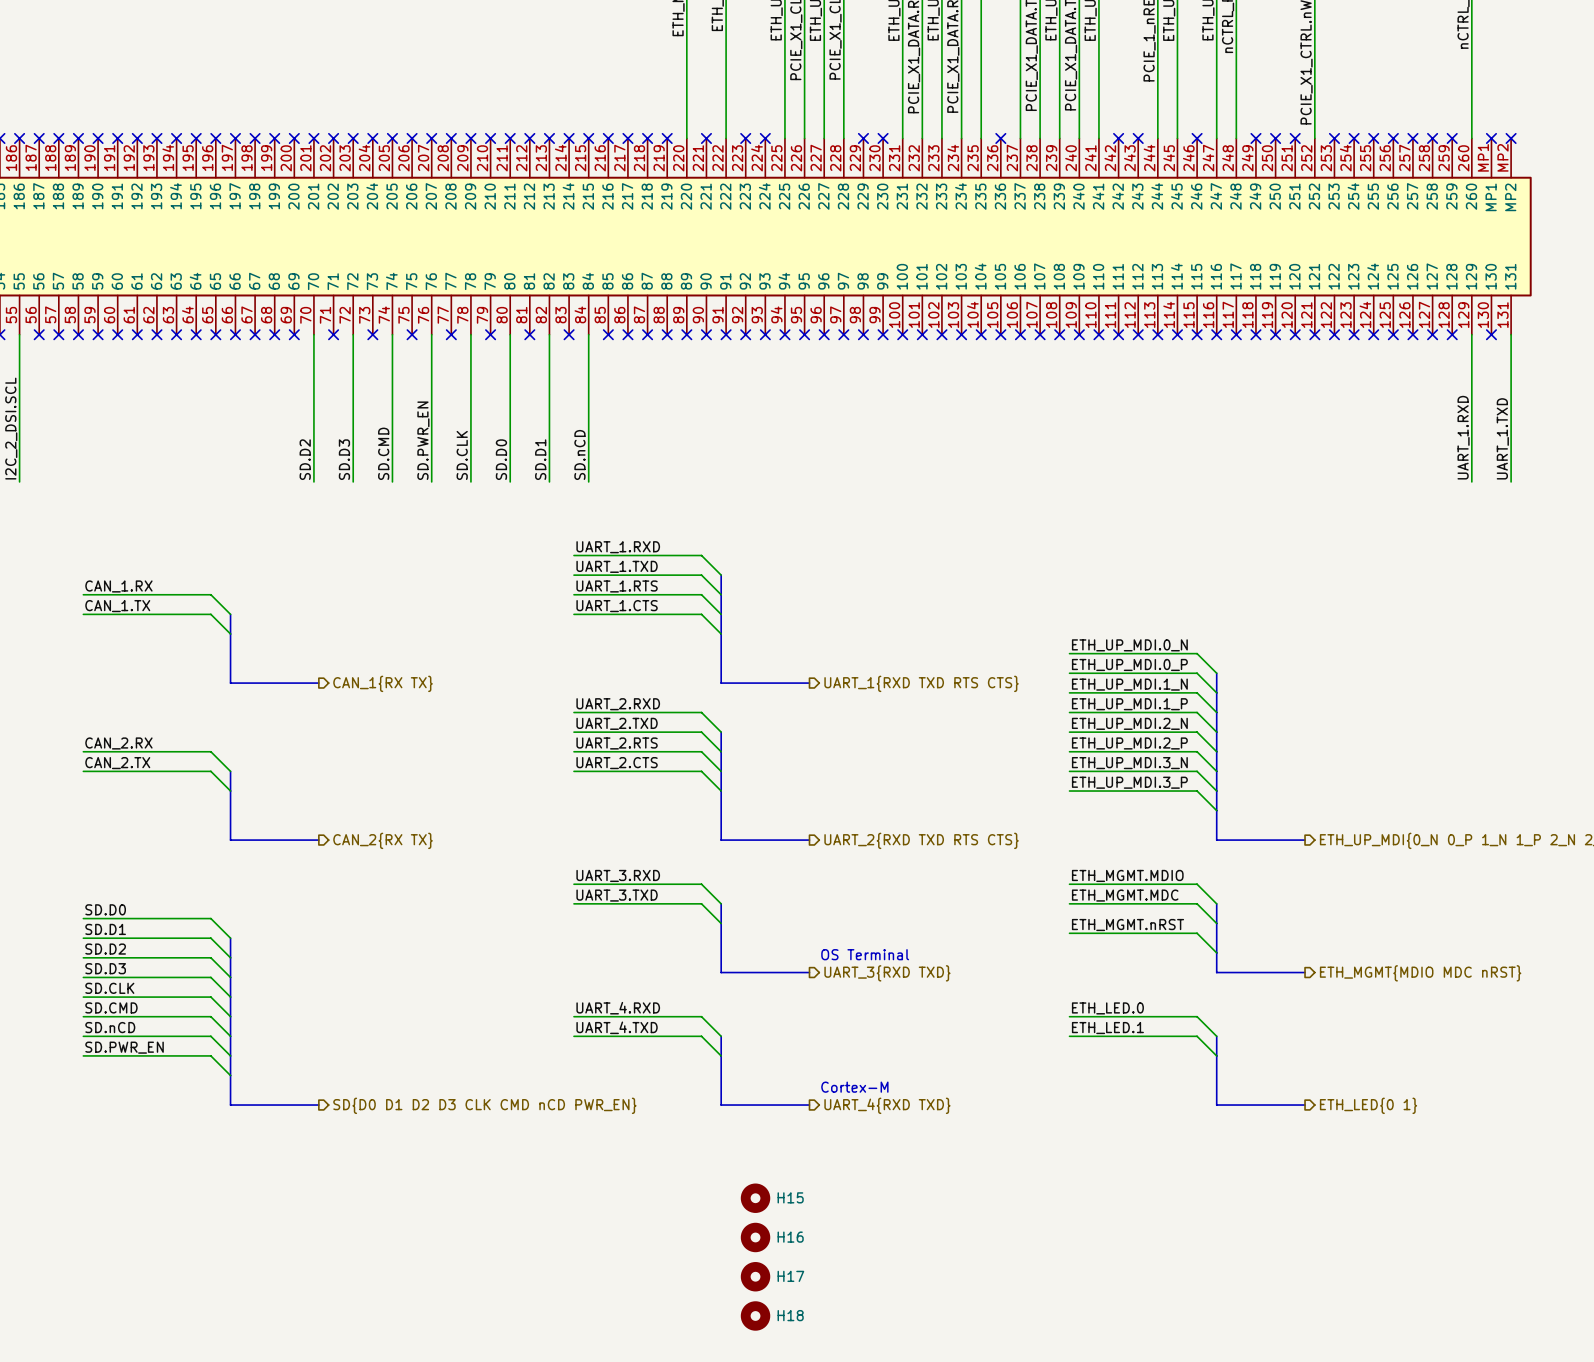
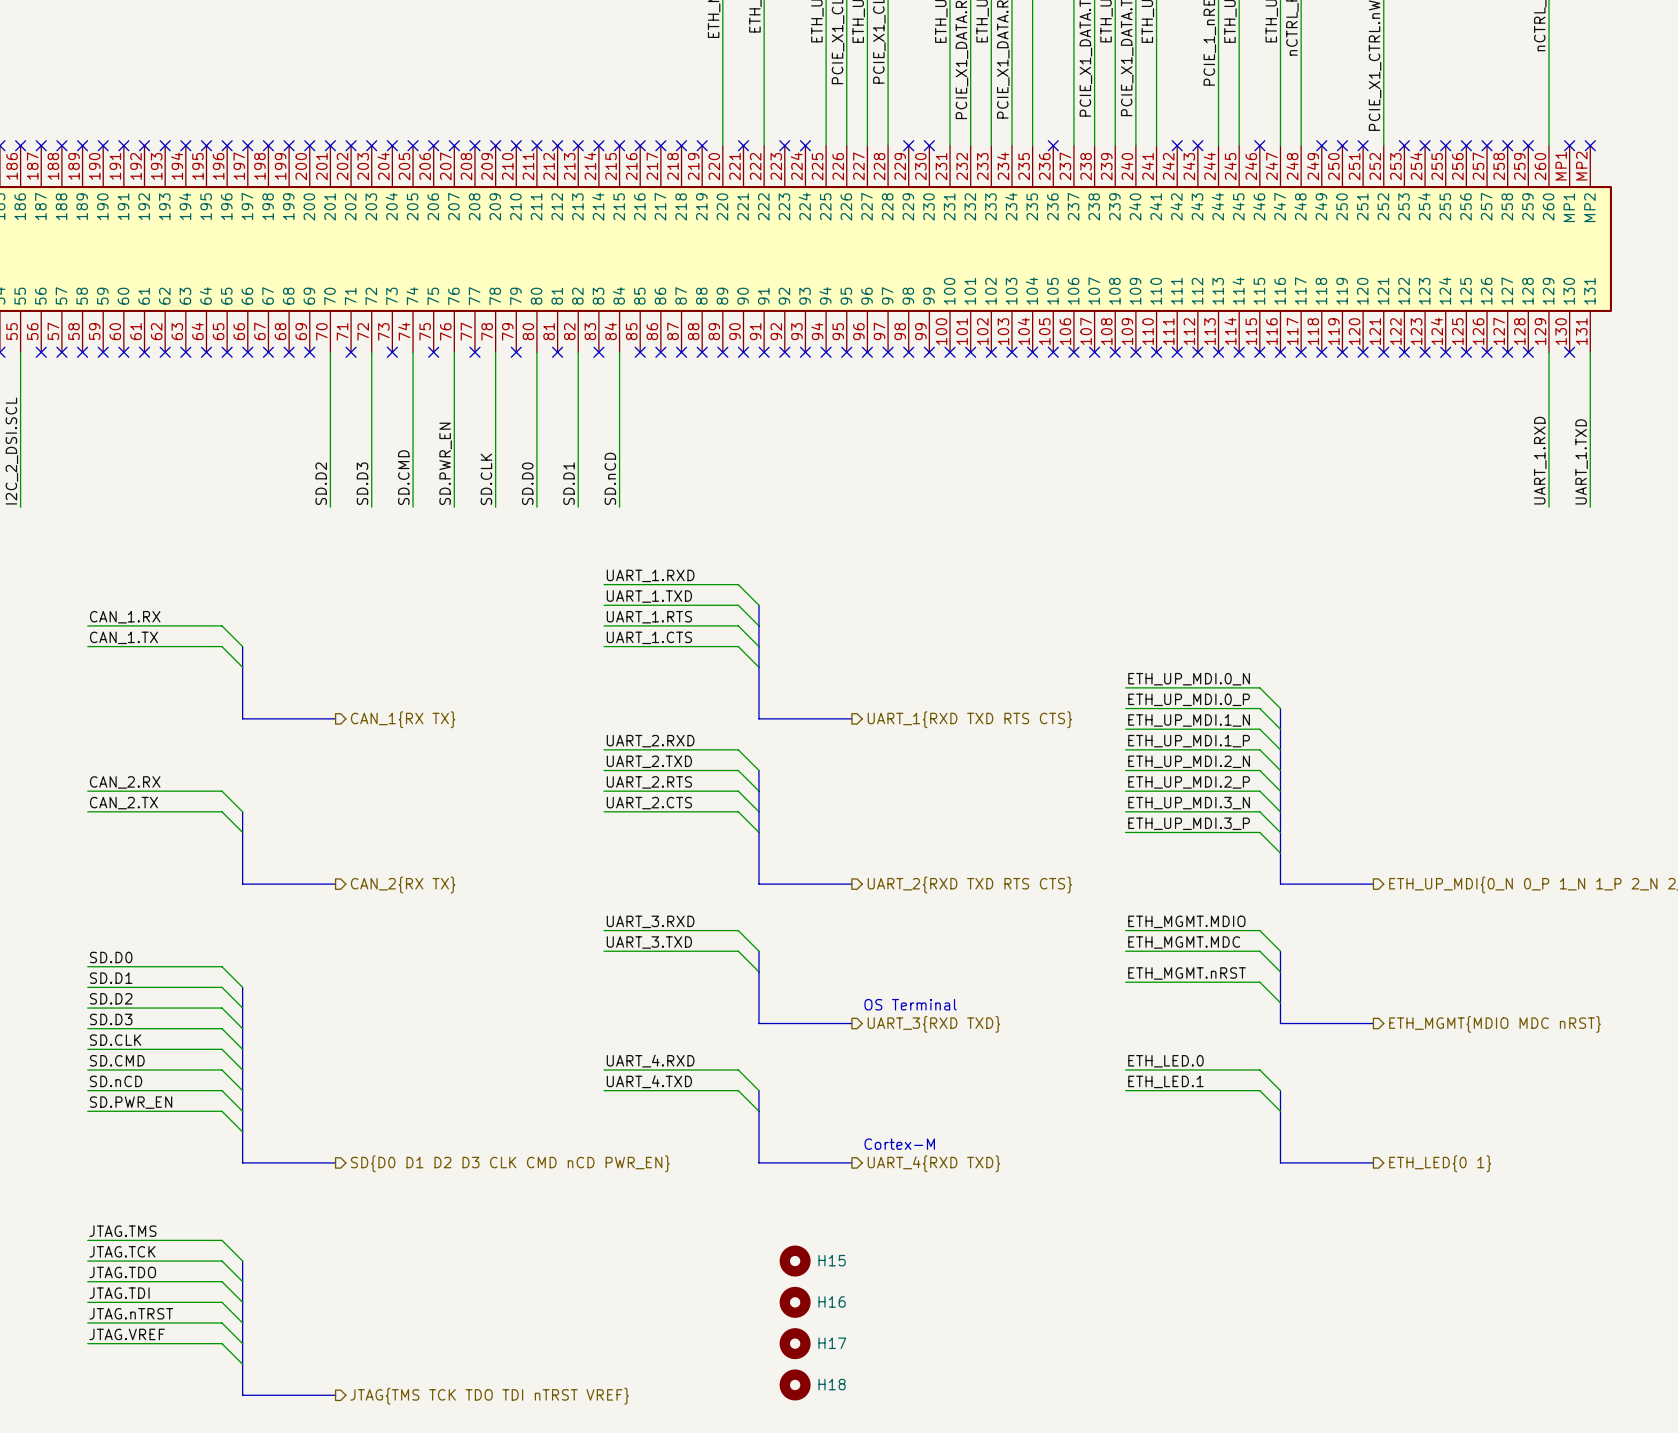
label: none -> JTAG.TMS (122, 1231)
wire: none -> (87, 1240) (221, 1240) (242, 1261)
label: none -> JTAG.TCK (122, 1251)
wire: none -> (87, 1261) (221, 1261) (242, 1281)
bus: none -> (242, 1261) (242, 1395) (335, 1395)
label: none -> JTAG.TDO (122, 1272)
wire: none -> (87, 1281) (221, 1281) (242, 1302)
label: none -> JTAG.TDI (119, 1293)
wire: none -> (87, 1302) (221, 1302) (242, 1323)
label: none -> JTAG.nTRST (131, 1313)
wire: none -> (87, 1323) (221, 1323) (242, 1343)
label: none -> JTAG.VREF (127, 1334)
wire: none -> (87, 1343) (221, 1343) (242, 1364)
hierarchical label: none -> JTAG{TMS TCK TDO TDI nTRST VREF} (489, 1396)

